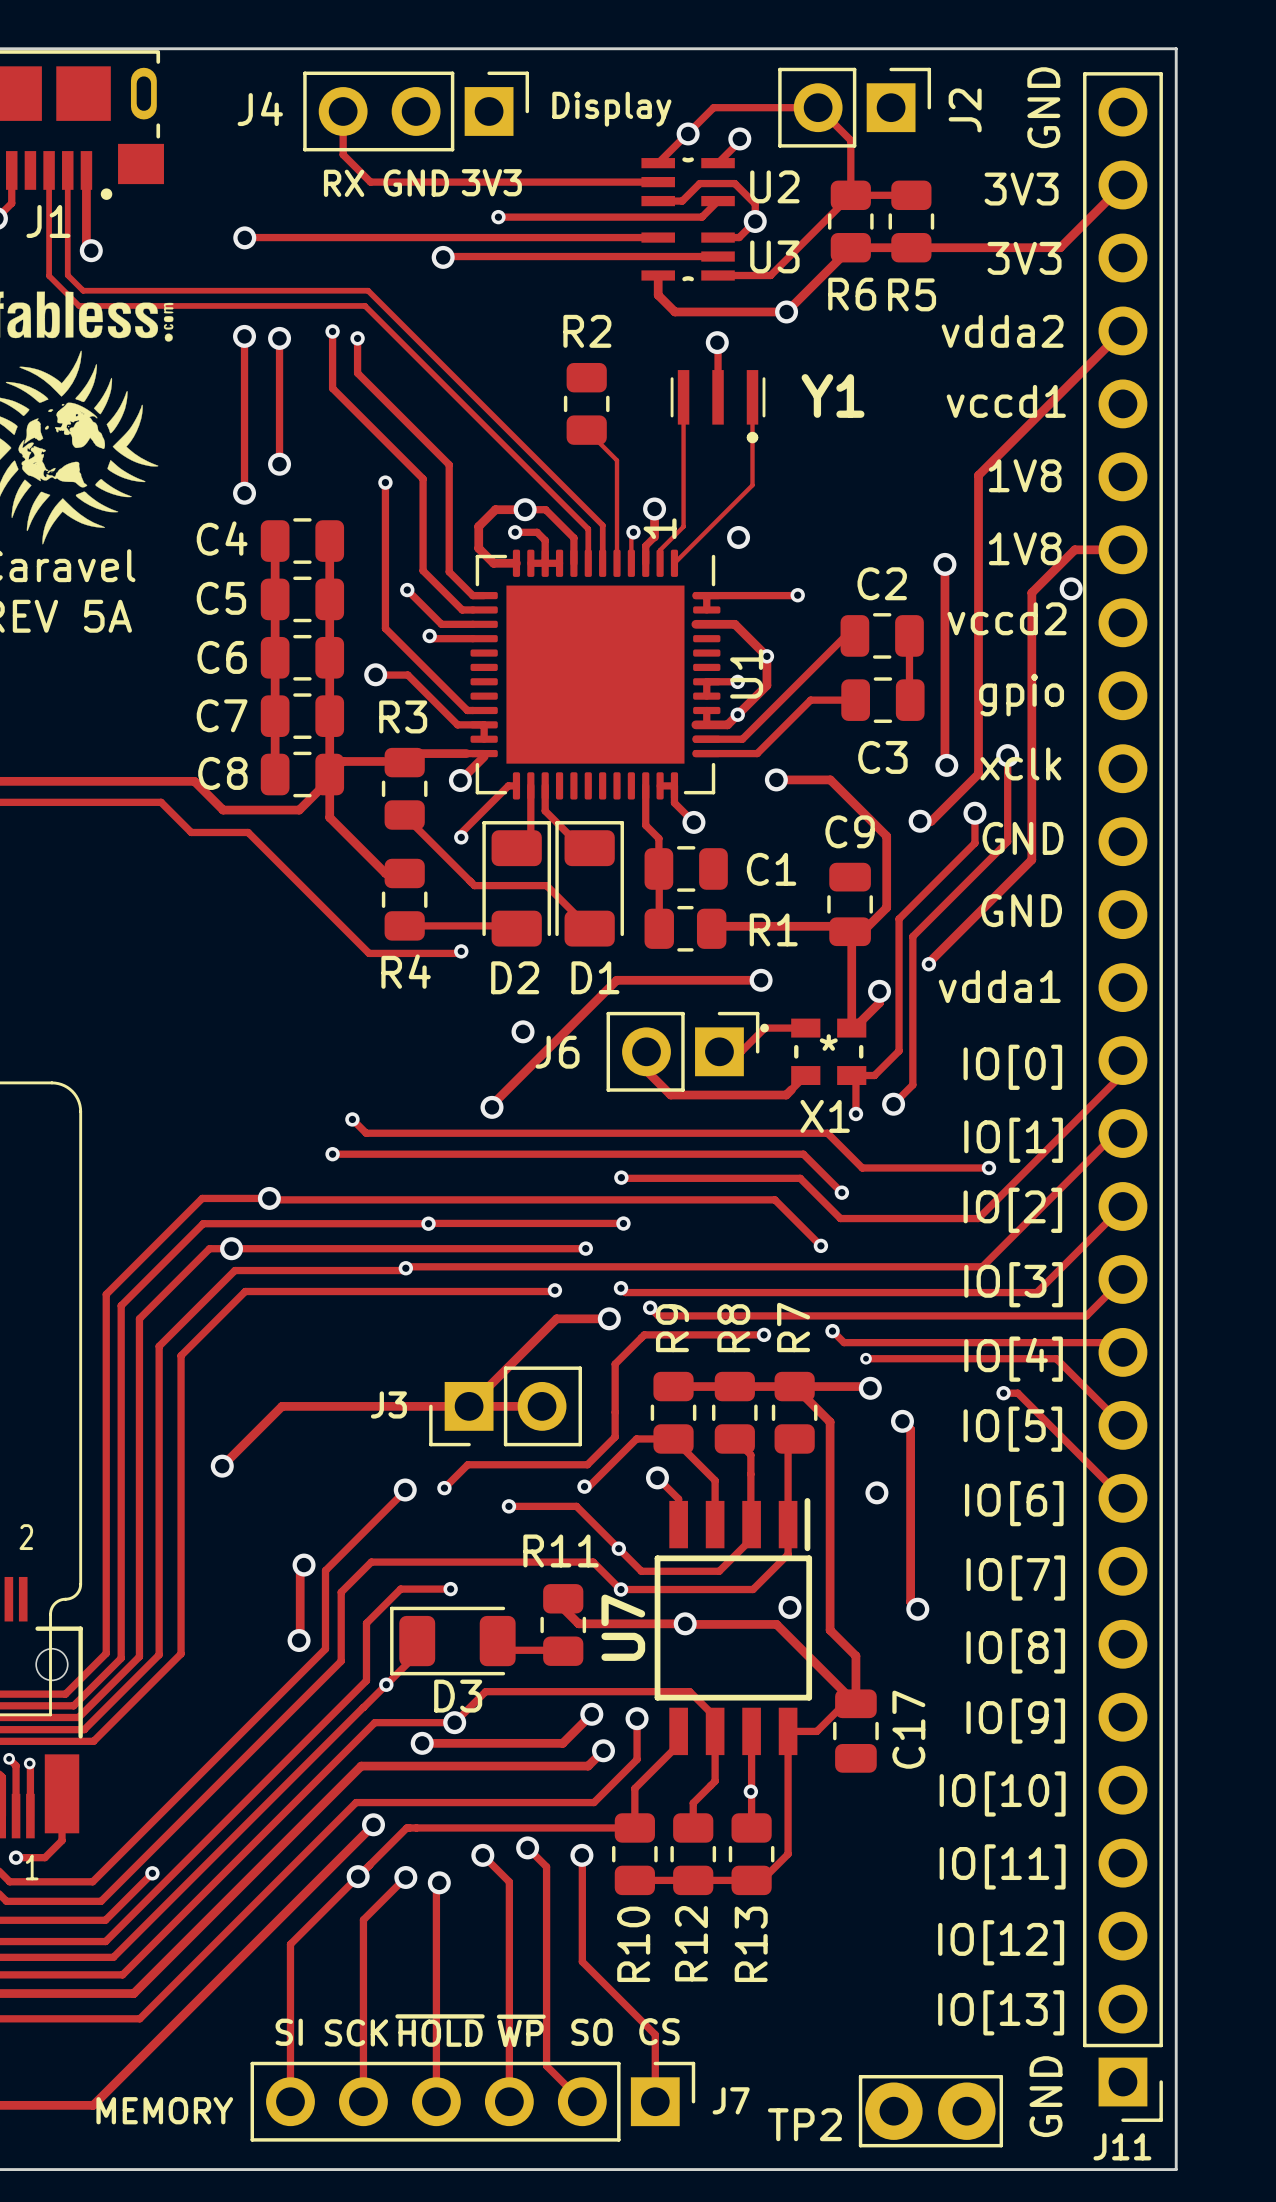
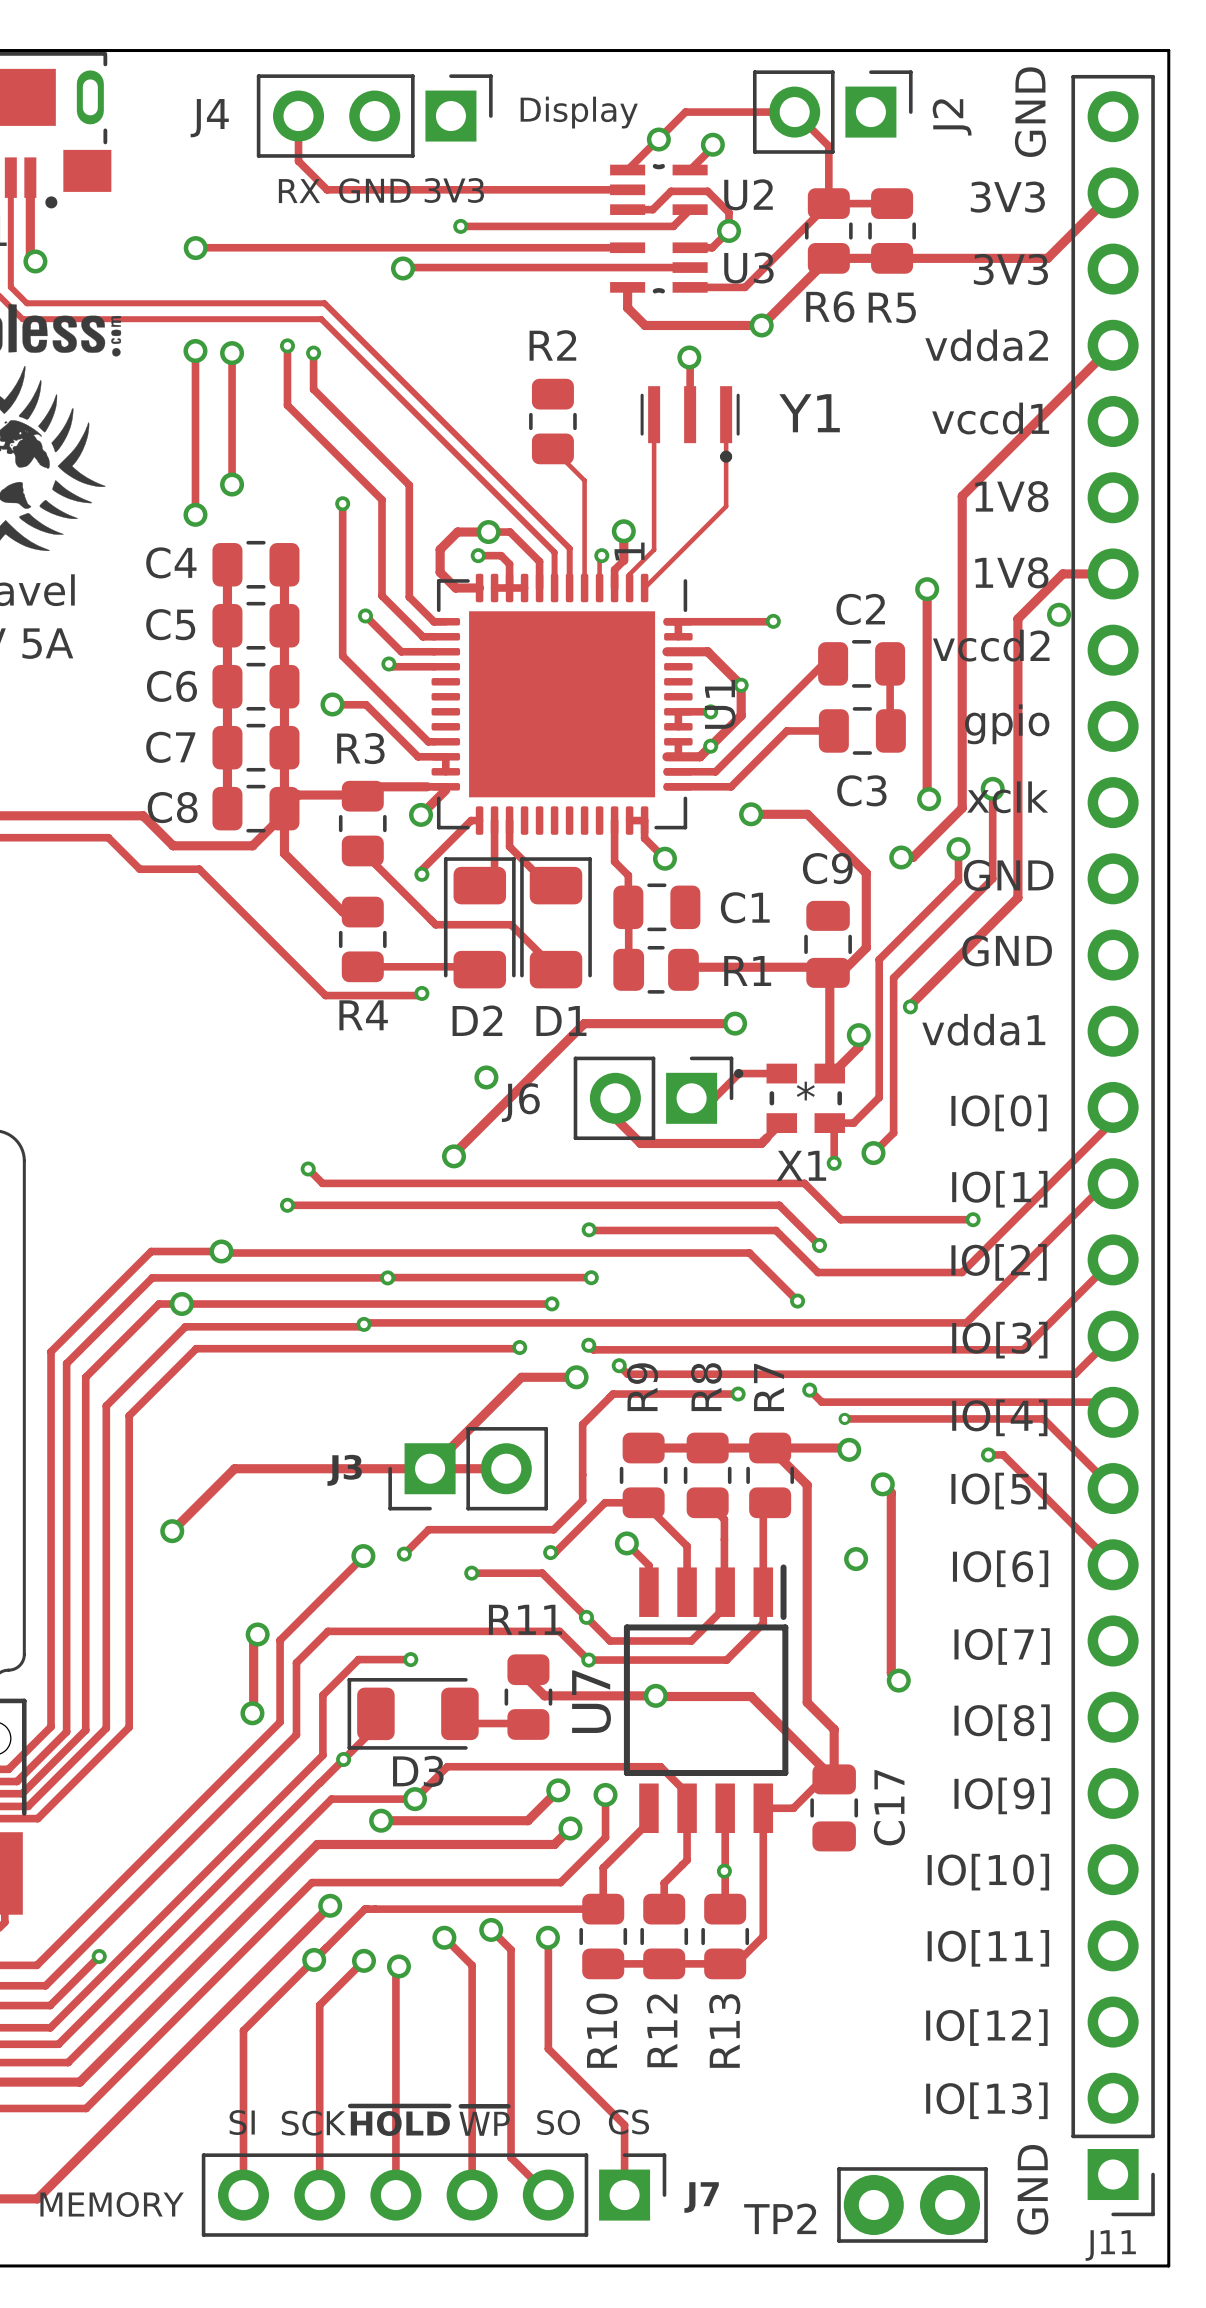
via: (738, 537) -> none
via: (789, 1607) -> none

